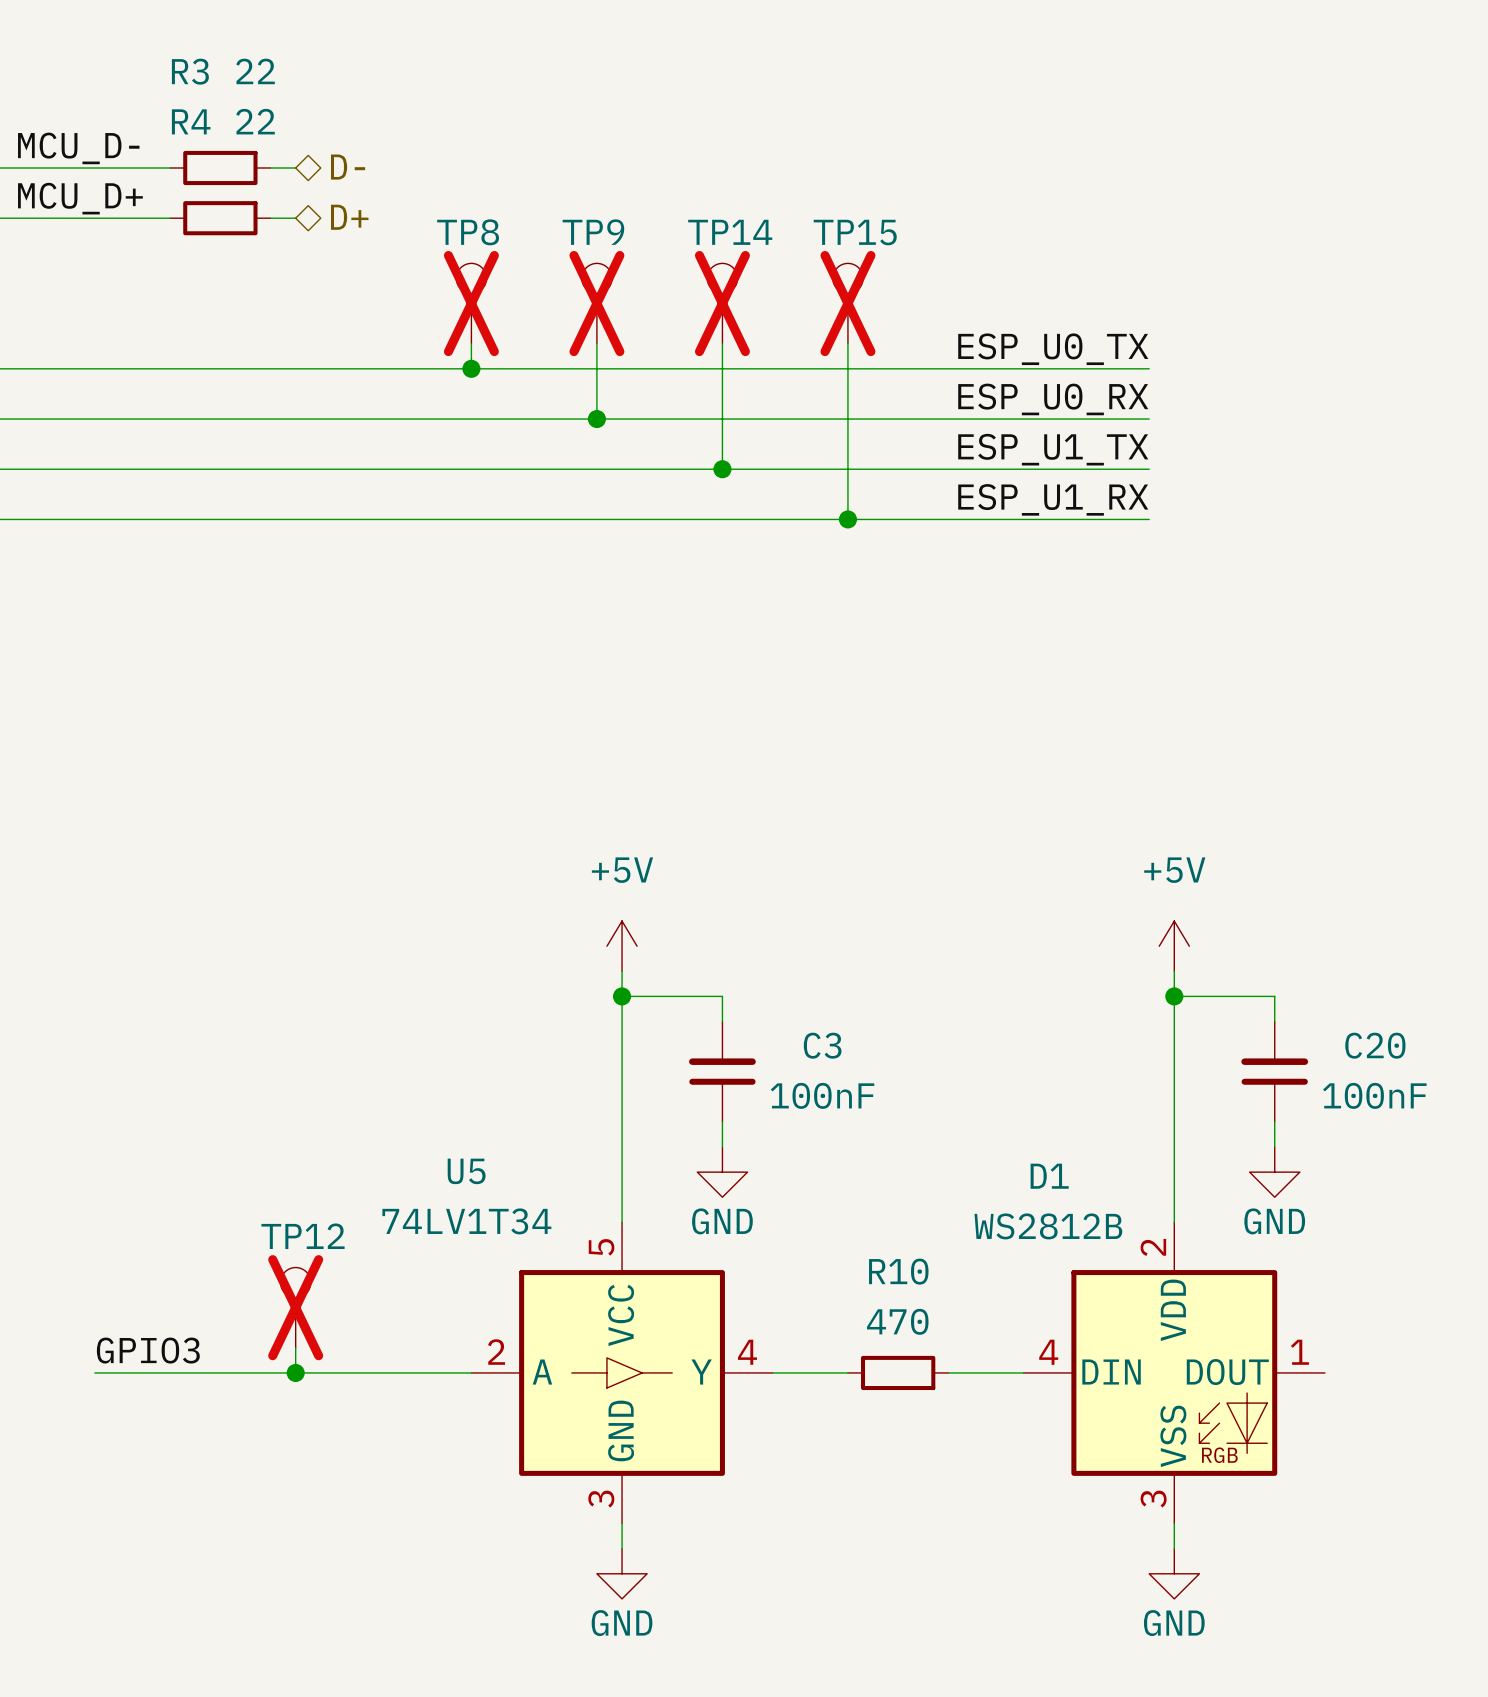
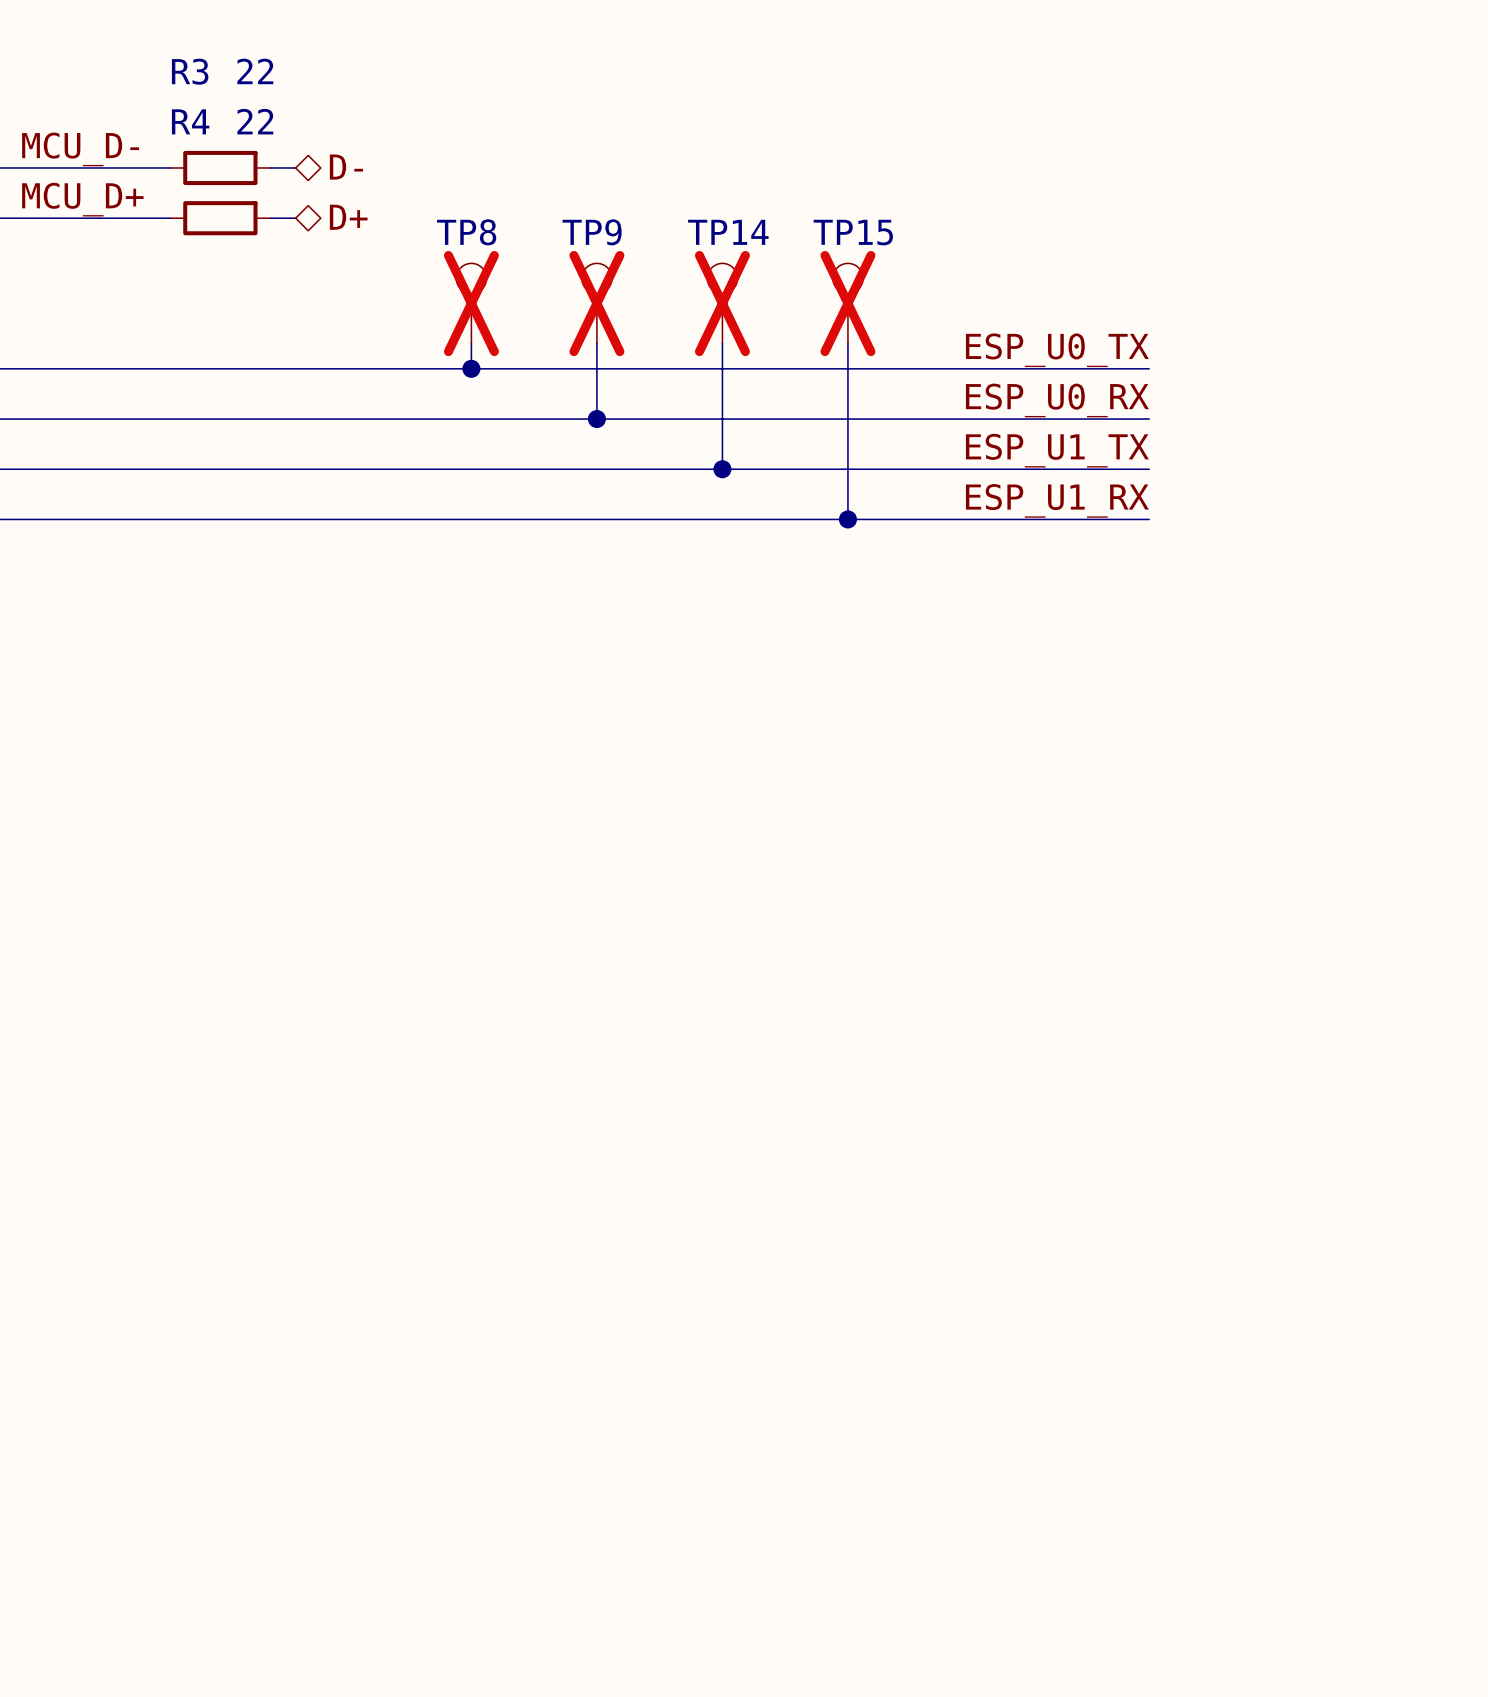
power symbol: +5V (622, 946) -> none
power symbol: +5V (1174, 946) -> none
wire: (622, 971) (622, 1222) -> none
wire: (1174, 971) (1174, 1222) -> none
wire: (622, 996) (722, 996) (722, 1021) -> none
junction: (622, 996) -> none
wire: (1174, 996) (1274, 996) (1274, 1021) -> none
junction: (1174, 996) -> none
C3: 100nF (722, 1071) -> none
C20: 100nF (1274, 1071) -> none
wire: (722, 1121) (722, 1147) -> none
wire: (1274, 1121) (1274, 1147) -> none
power symbol: GND (722, 1172) -> none
power symbol: GND (1274, 1172) -> none
TP12: (295, 1307) -> none
wire: (295, 1347) (295, 1372) -> none
label: GPIO3 (148, 1350) -> none
wire: (94, 1372) (471, 1372) -> none
junction: (295, 1372) -> none
U5: 74LV1T34 (622, 1372) -> none
wire: (772, 1372) (847, 1372) -> none
R10: 470 (898, 1372) -> none
wire: (948, 1372) (1023, 1372) -> none
D1: WS2812B (1174, 1372) -> none
wire: (622, 1523) (622, 1548) -> none
wire: (1174, 1523) (1174, 1548) -> none
power symbol: GND (622, 1573) -> none
power symbol: GND (1174, 1573) -> none

